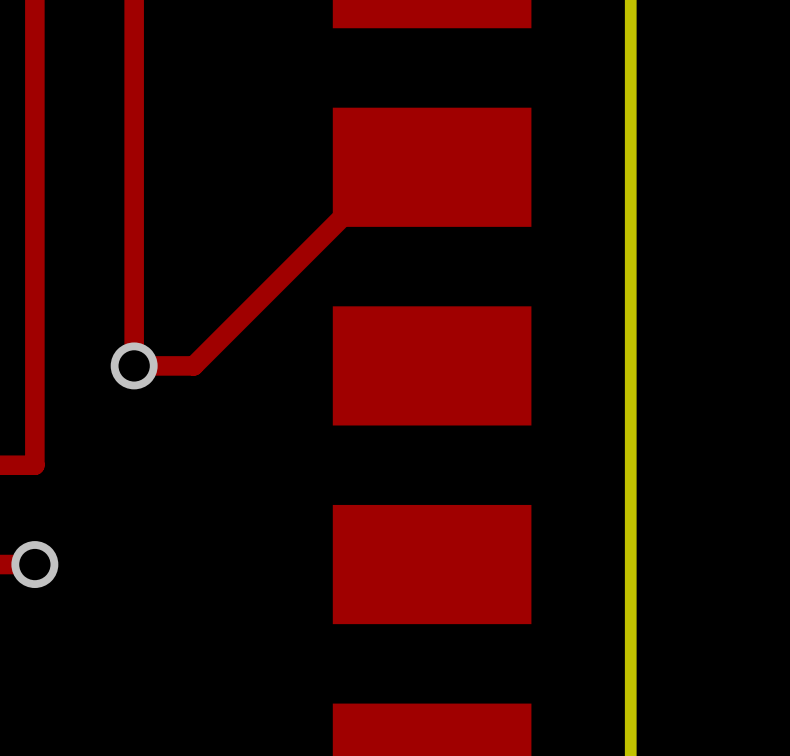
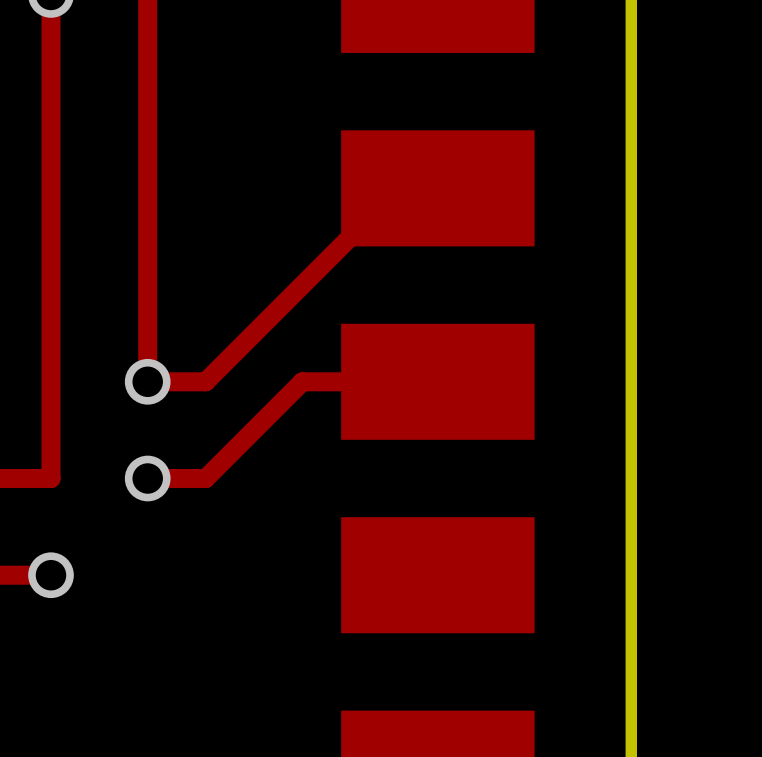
track: none -> (437, 381) (302, 381) (205, 478) (147, 478)
via: none -> (147, 478)

